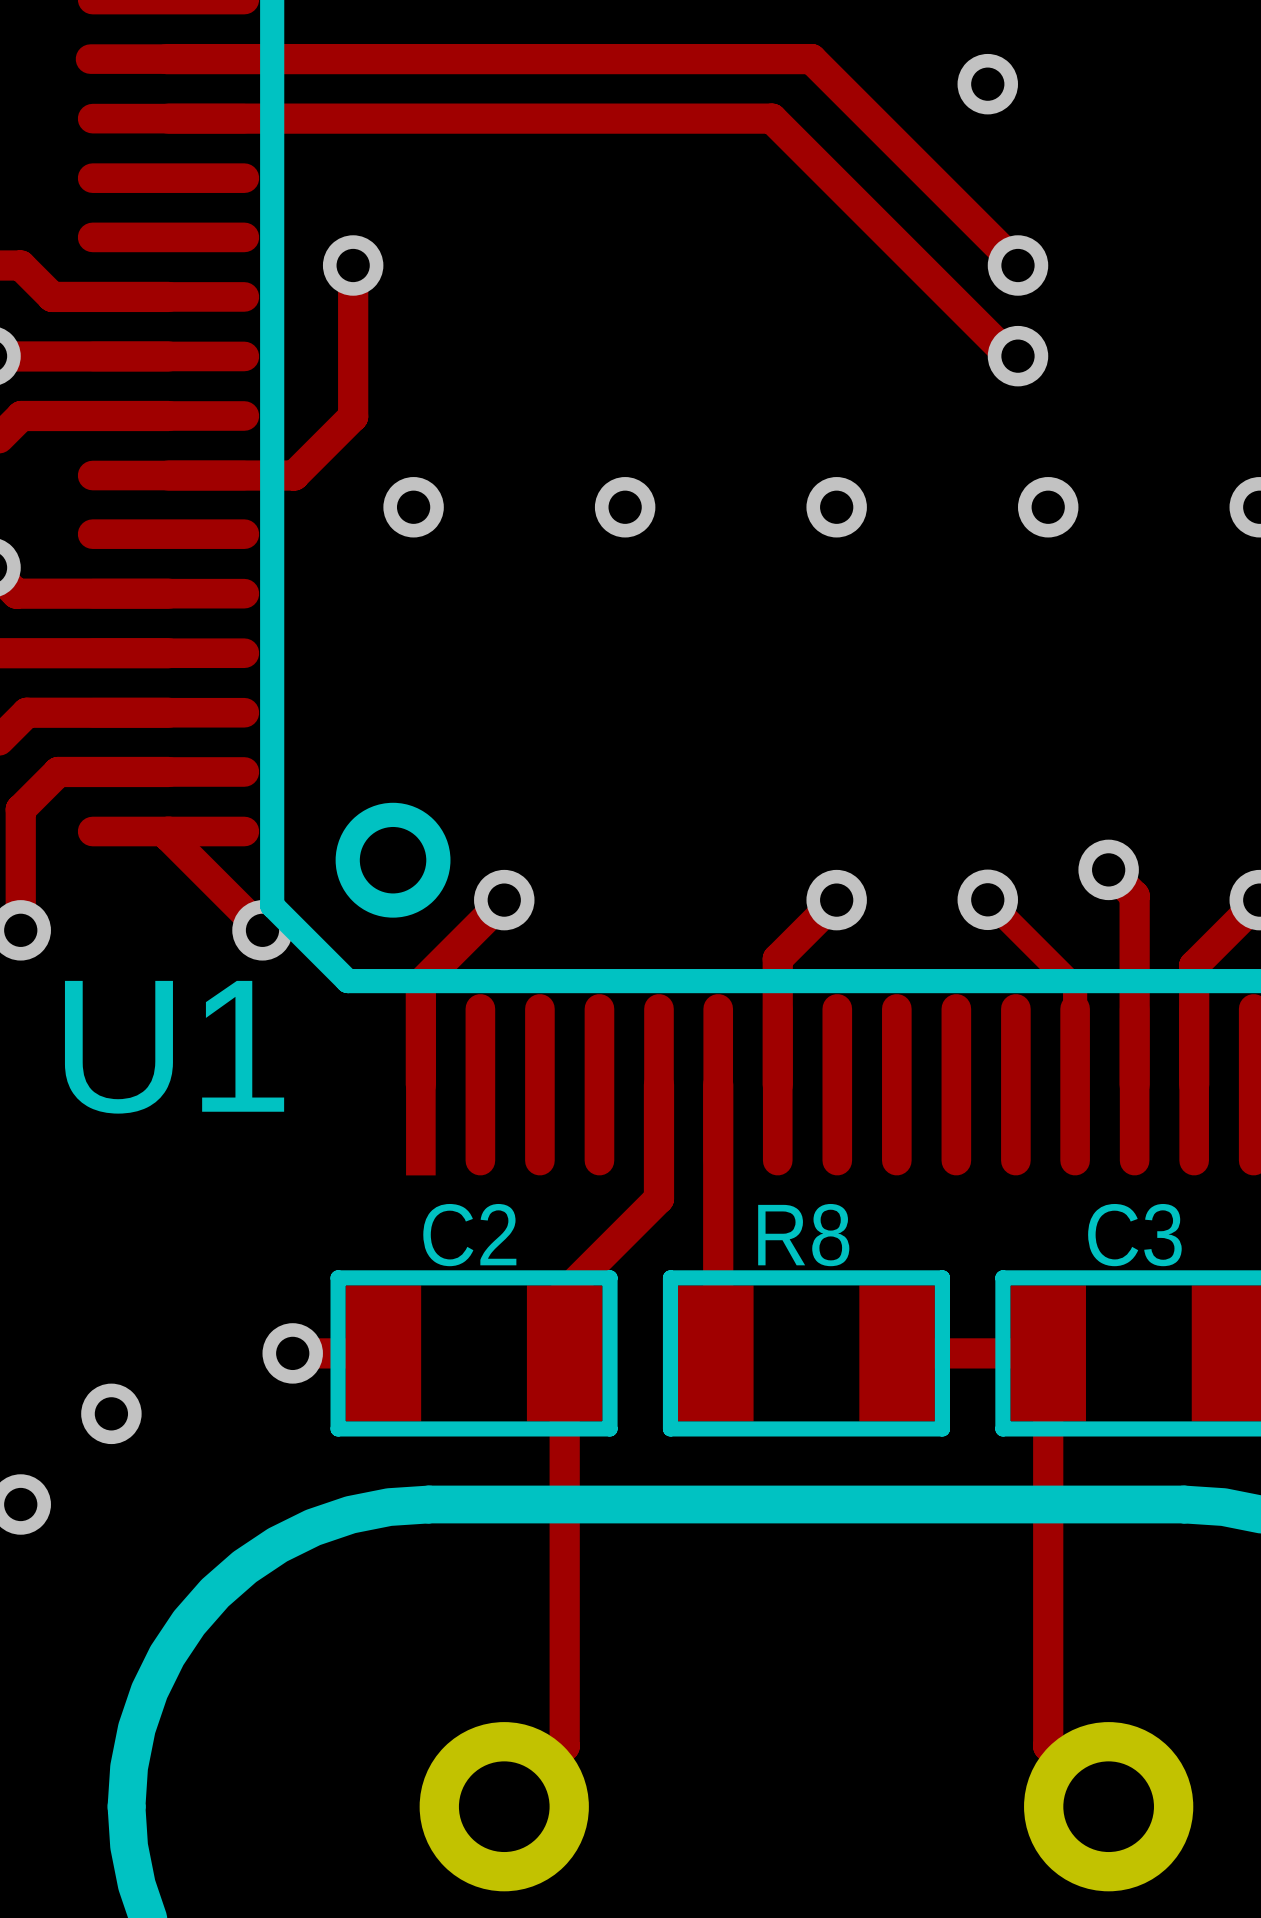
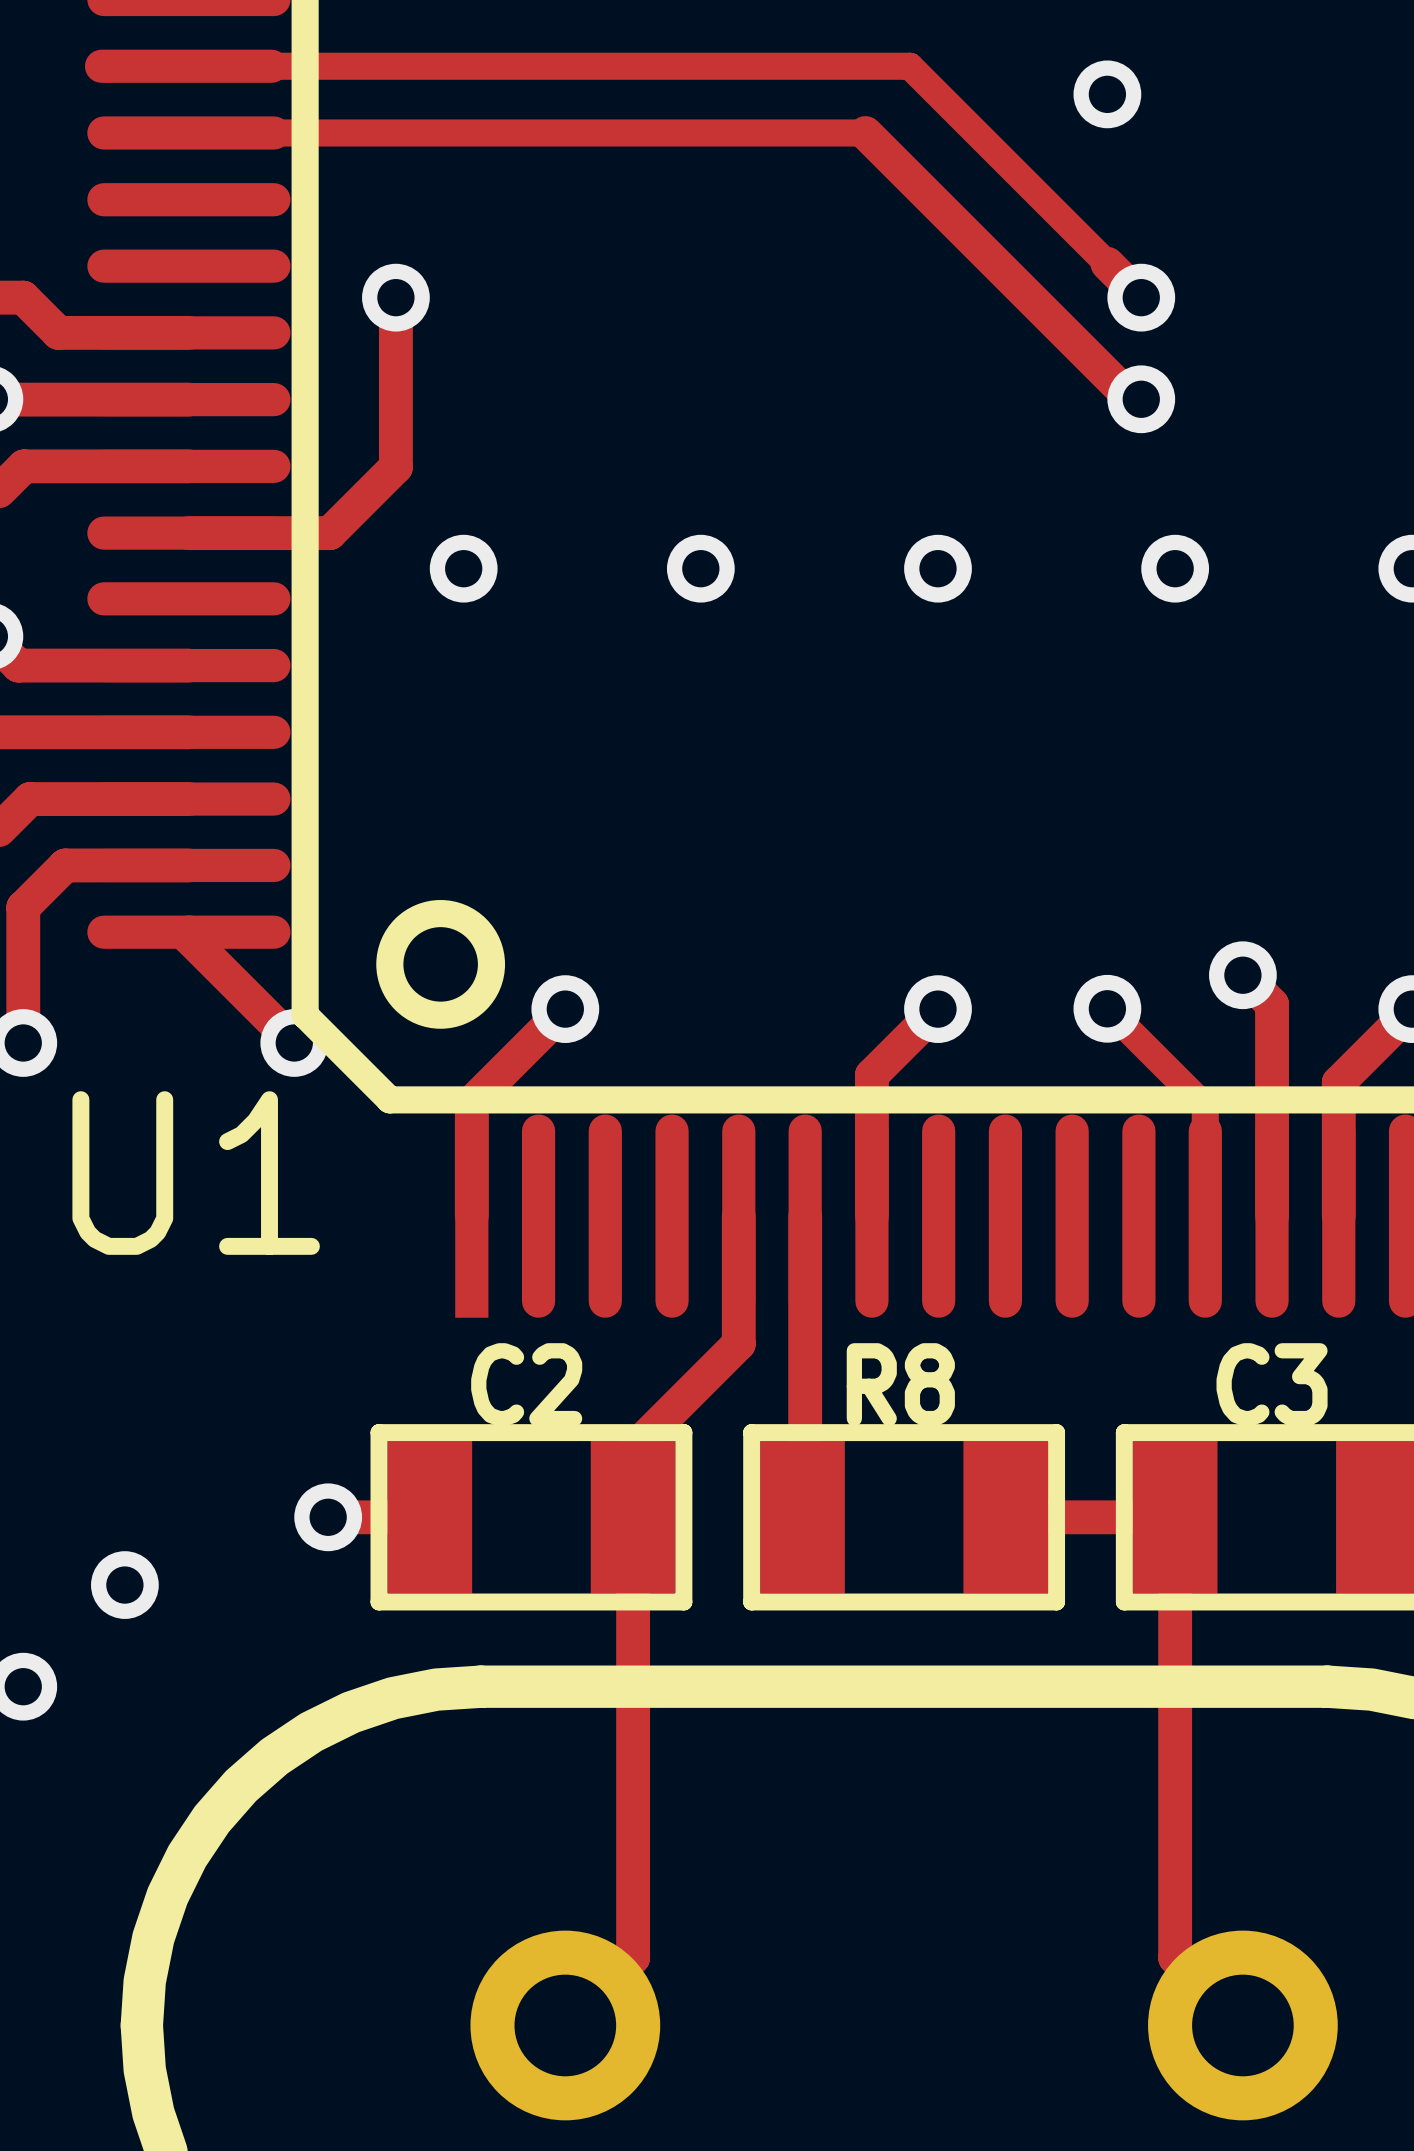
track width: thick (166, 59) (811, 59) (987, 235) -> thin (186, 66) (909, 66) (1107, 263)
track width: thick (168, 118) (772, 118) -> thin (188, 132) (865, 132)

